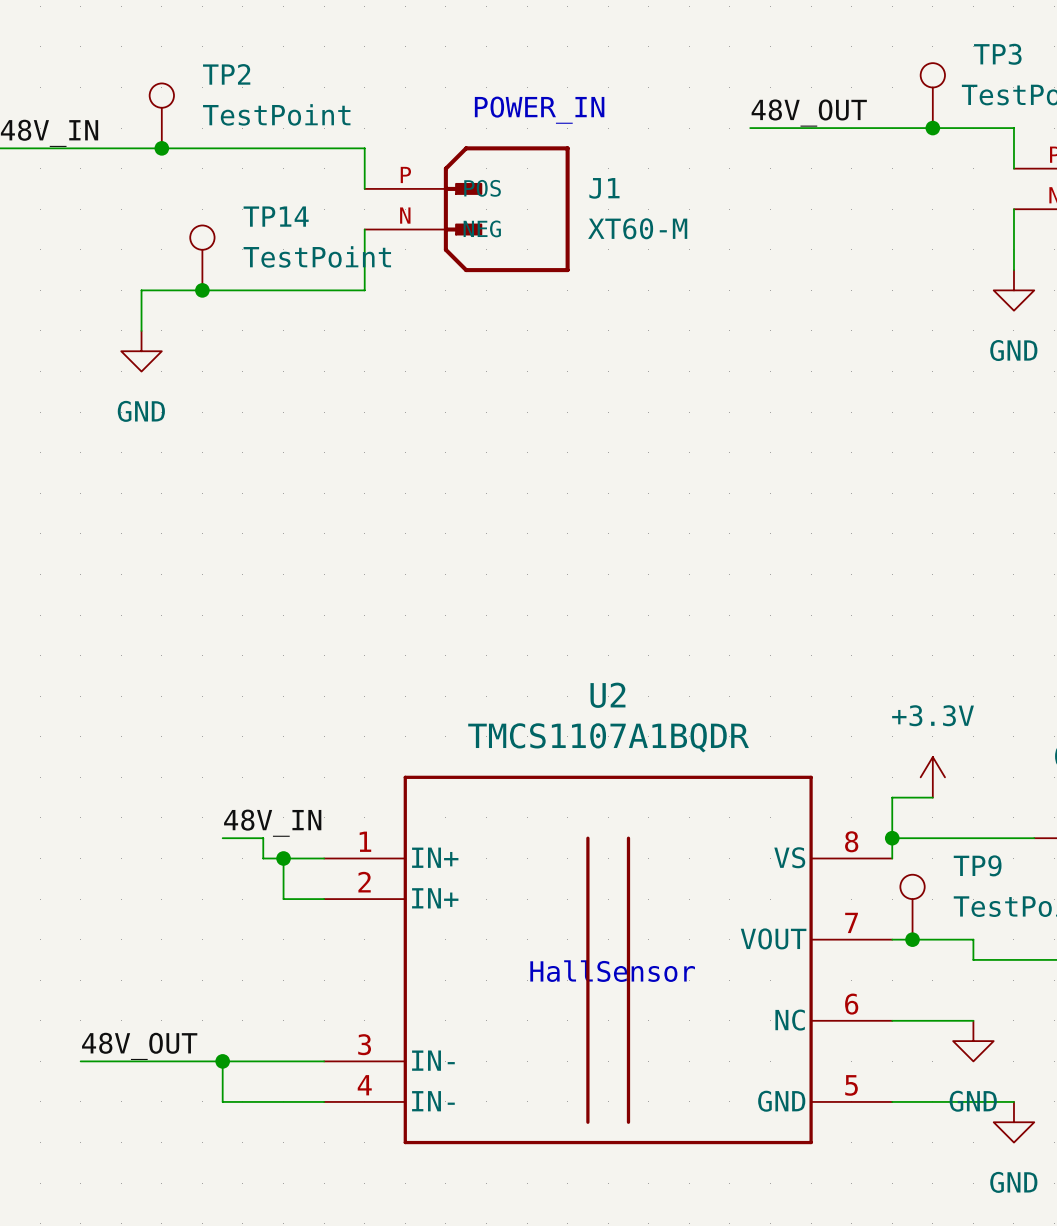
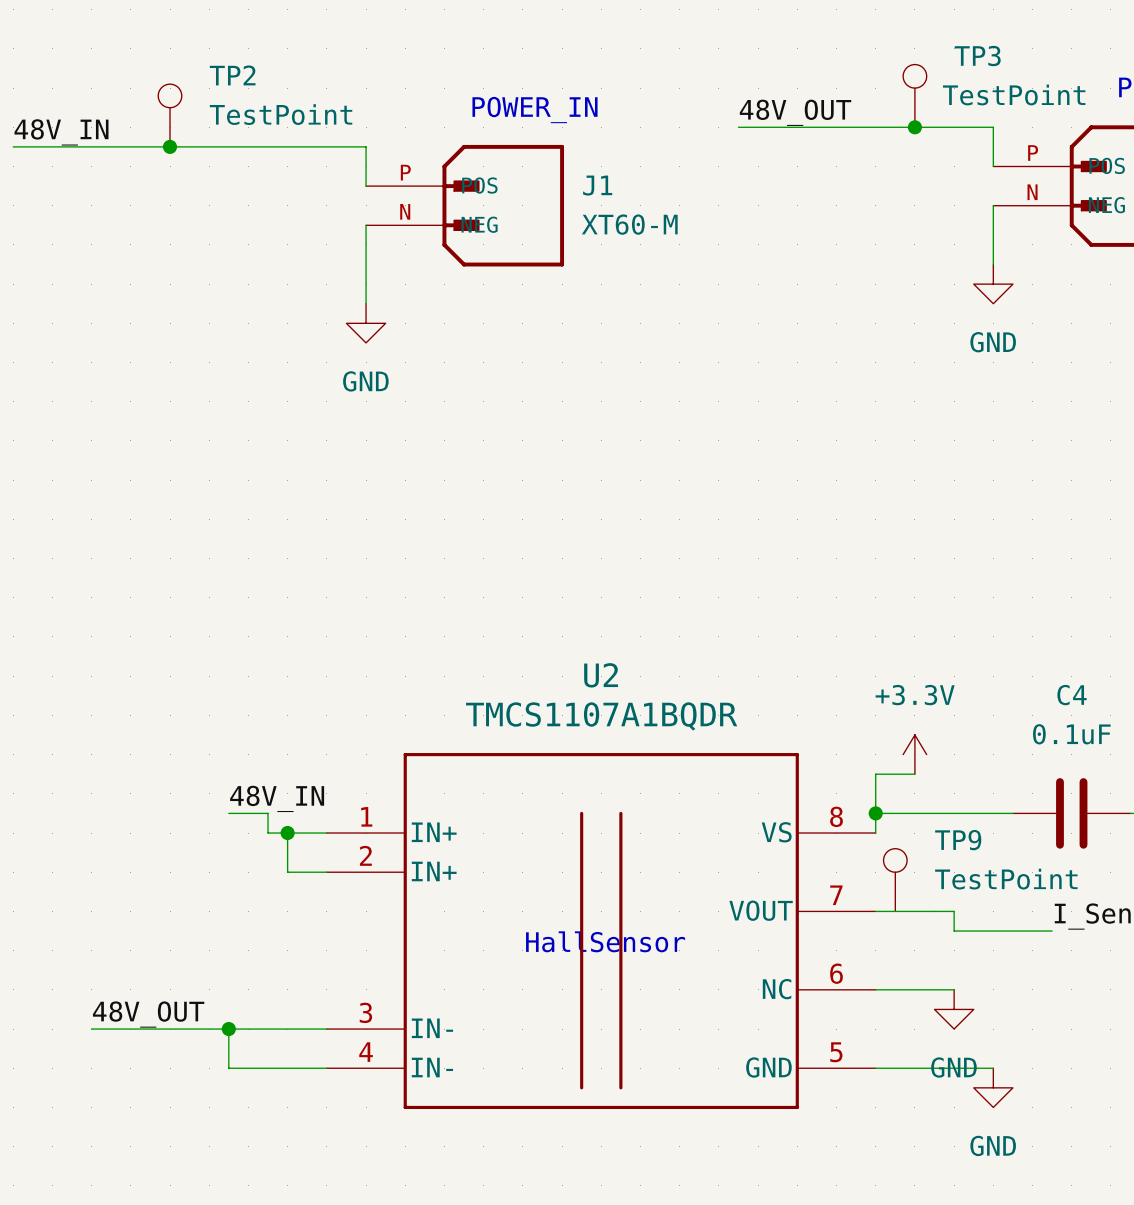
TP14: TestPoint (202, 257) -> none
junction: (202, 290) -> none
wire: (364, 290) (141, 290) (141, 330) -> (366, 284) (366, 303)
power symbol position: GND (141, 351) -> GND (366, 323)
junction: (912, 939) -> none

